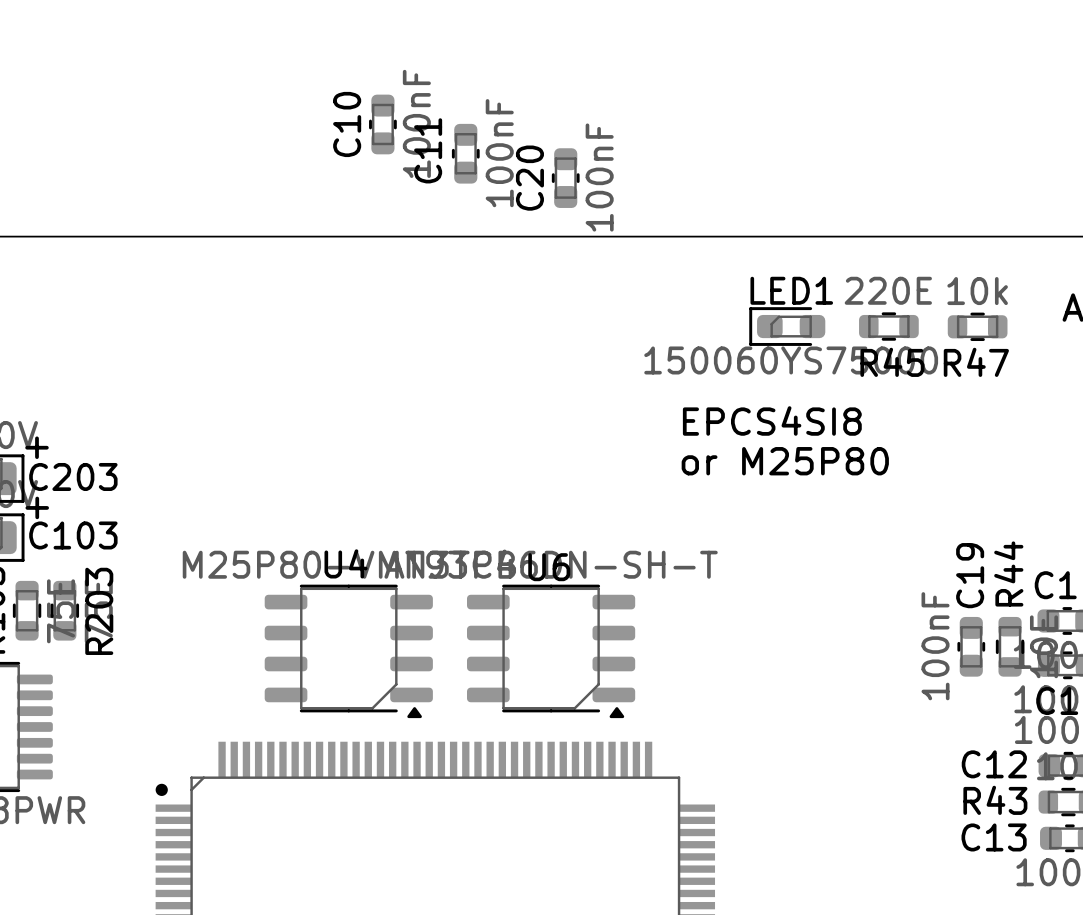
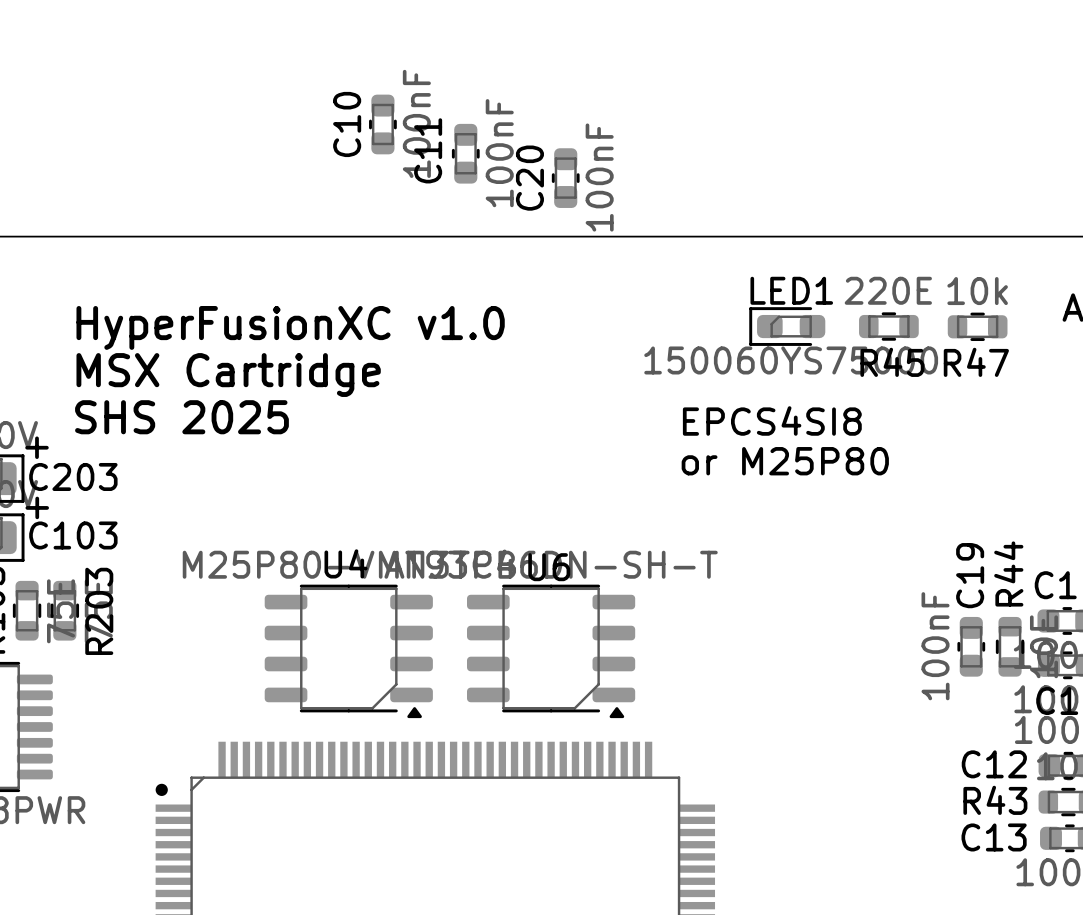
text: none -> HyperFusionXC v1.0 (290, 327)
text: none -> MSX Cartridge (228, 375)
text: none -> SHS 2025 (181, 417)

